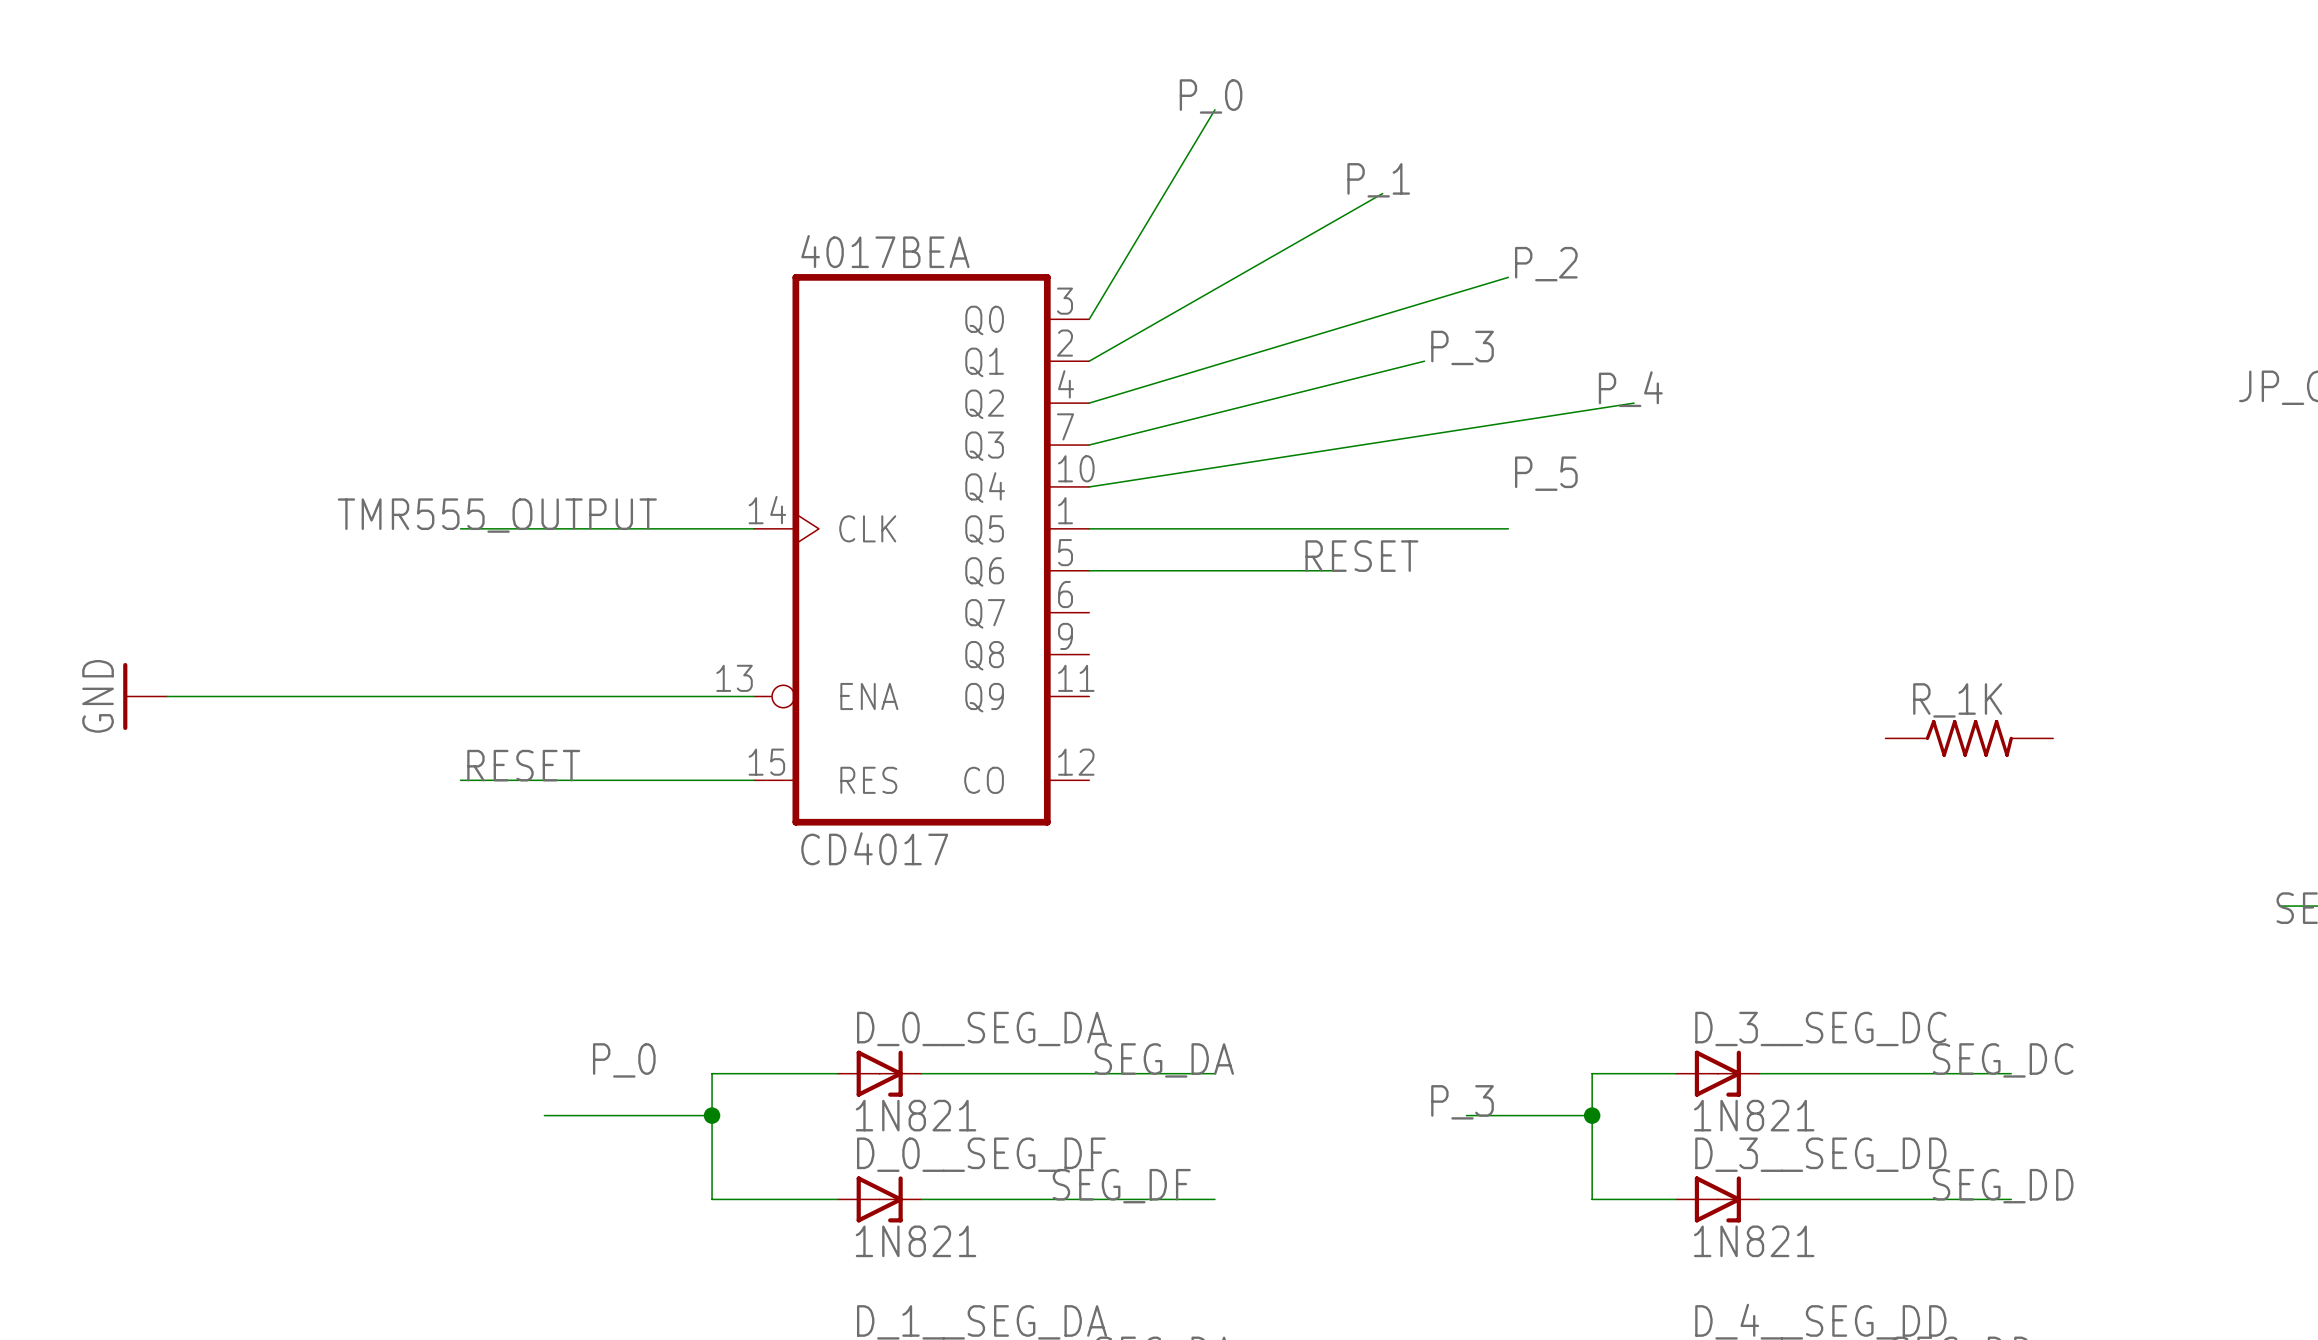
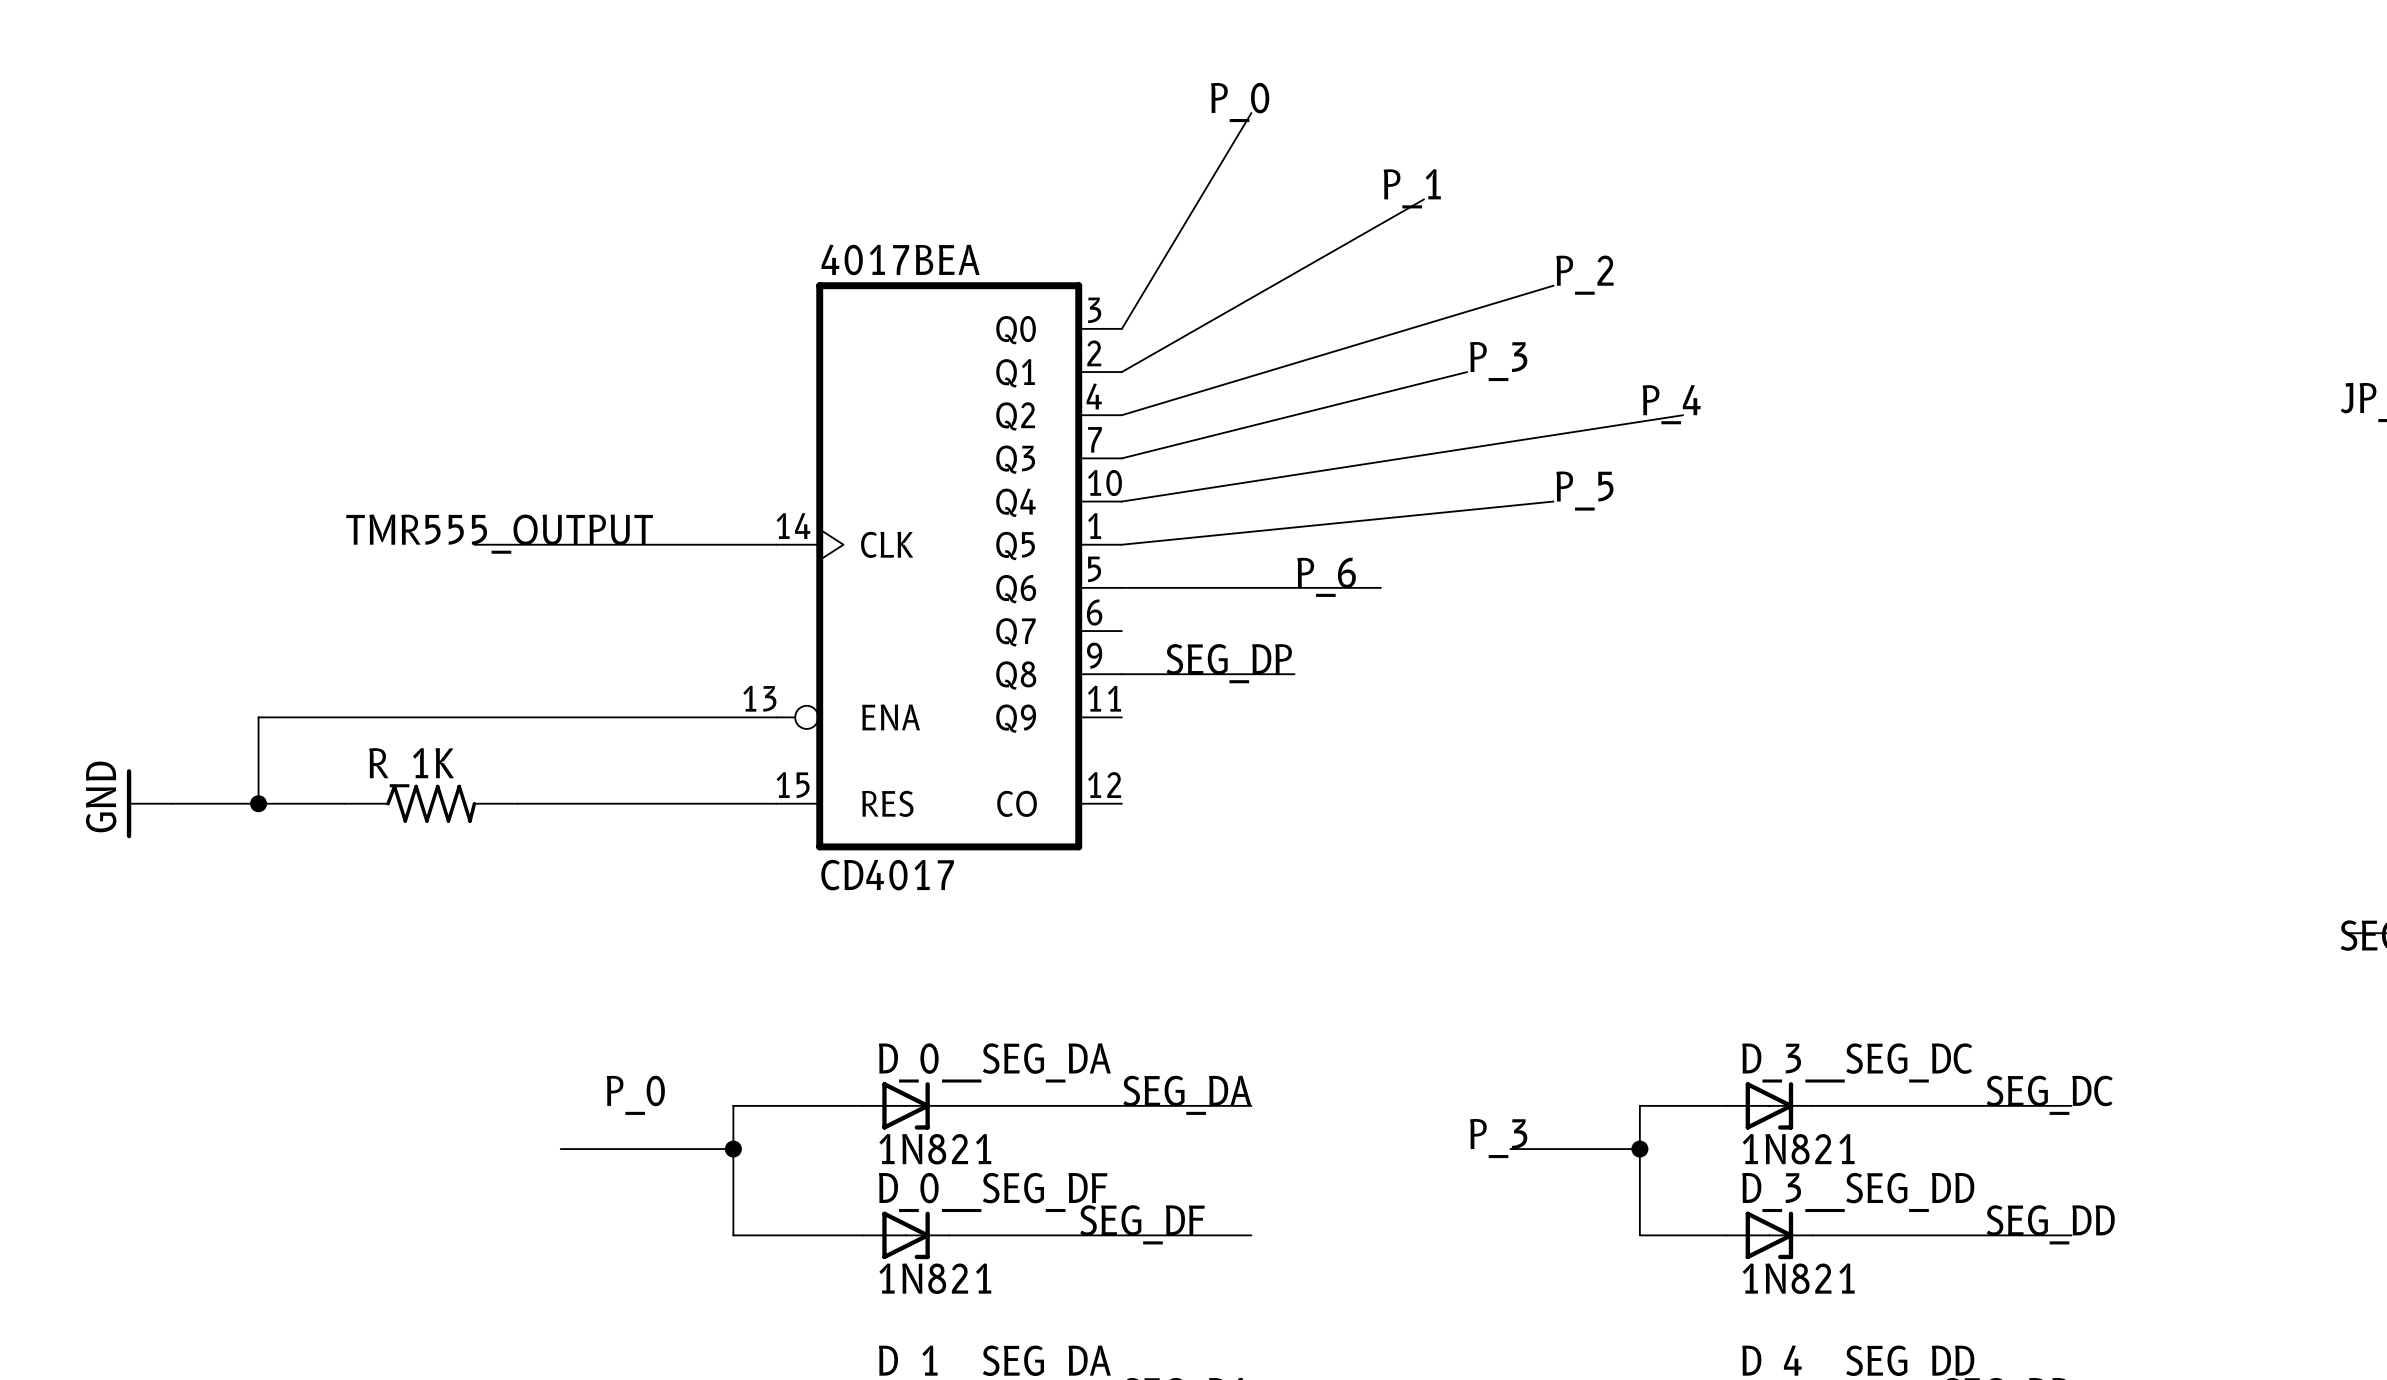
wire: (1089, 528) (1508, 528) -> (1121, 544) (1553, 501)
label: RESET (1361, 556) -> none
label: none -> P_6 (1326, 577)
label: none -> SEG_DP (1229, 663)
wire: none -> (1121, 674) (1294, 674)
power symbol position: GND (145, 696) -> GND (149, 803)
wire: (167, 696) (251, 696) -> (258, 803) (258, 717)
R_1K position: (1969, 738) -> (431, 803)
label: RESET (523, 765) -> none
wire: none -> (172, 803) (344, 803)
junction: none -> (258, 803)

